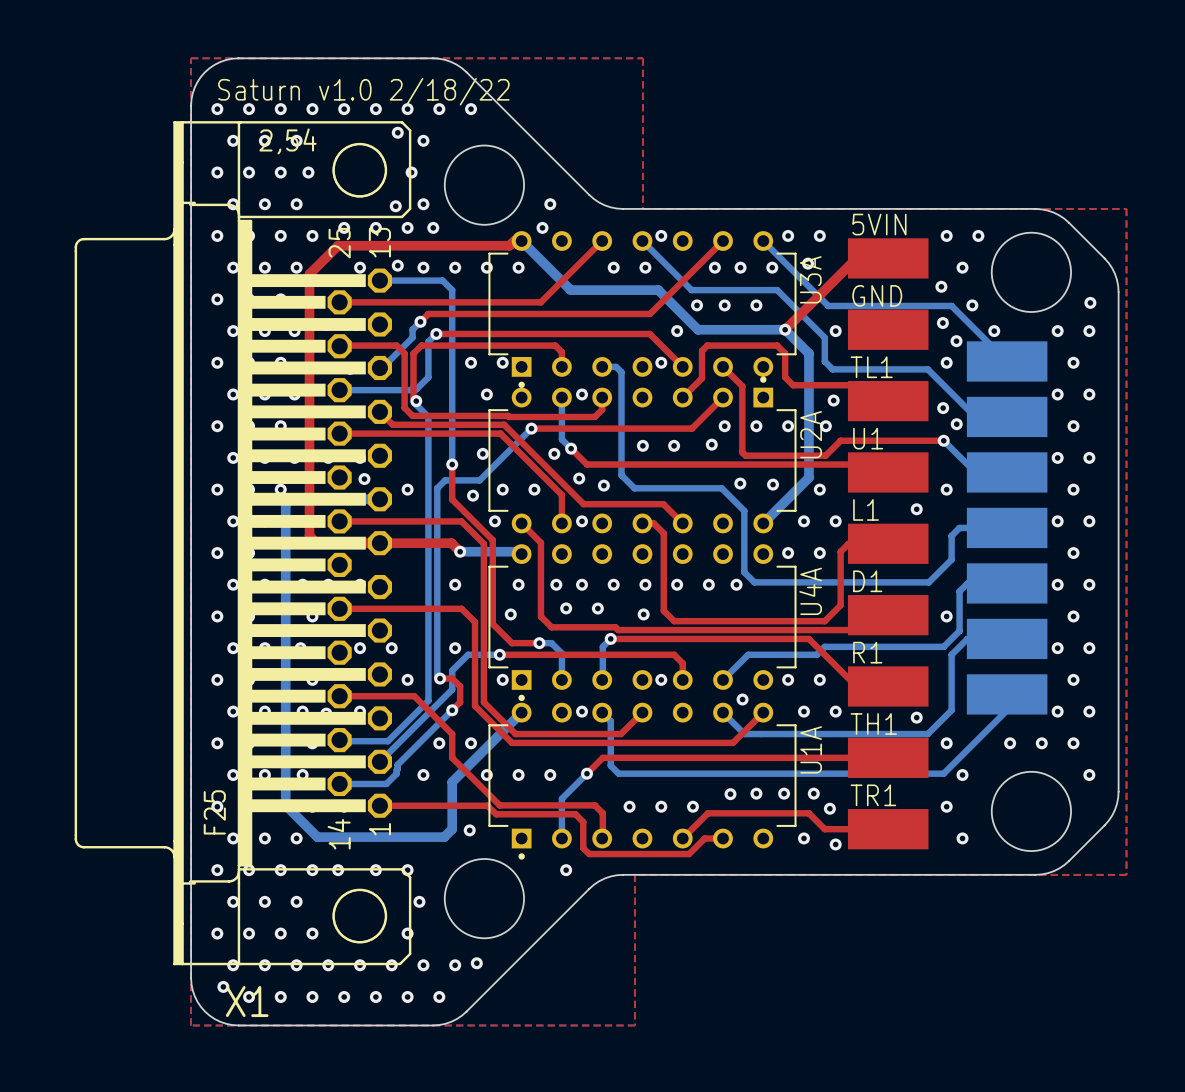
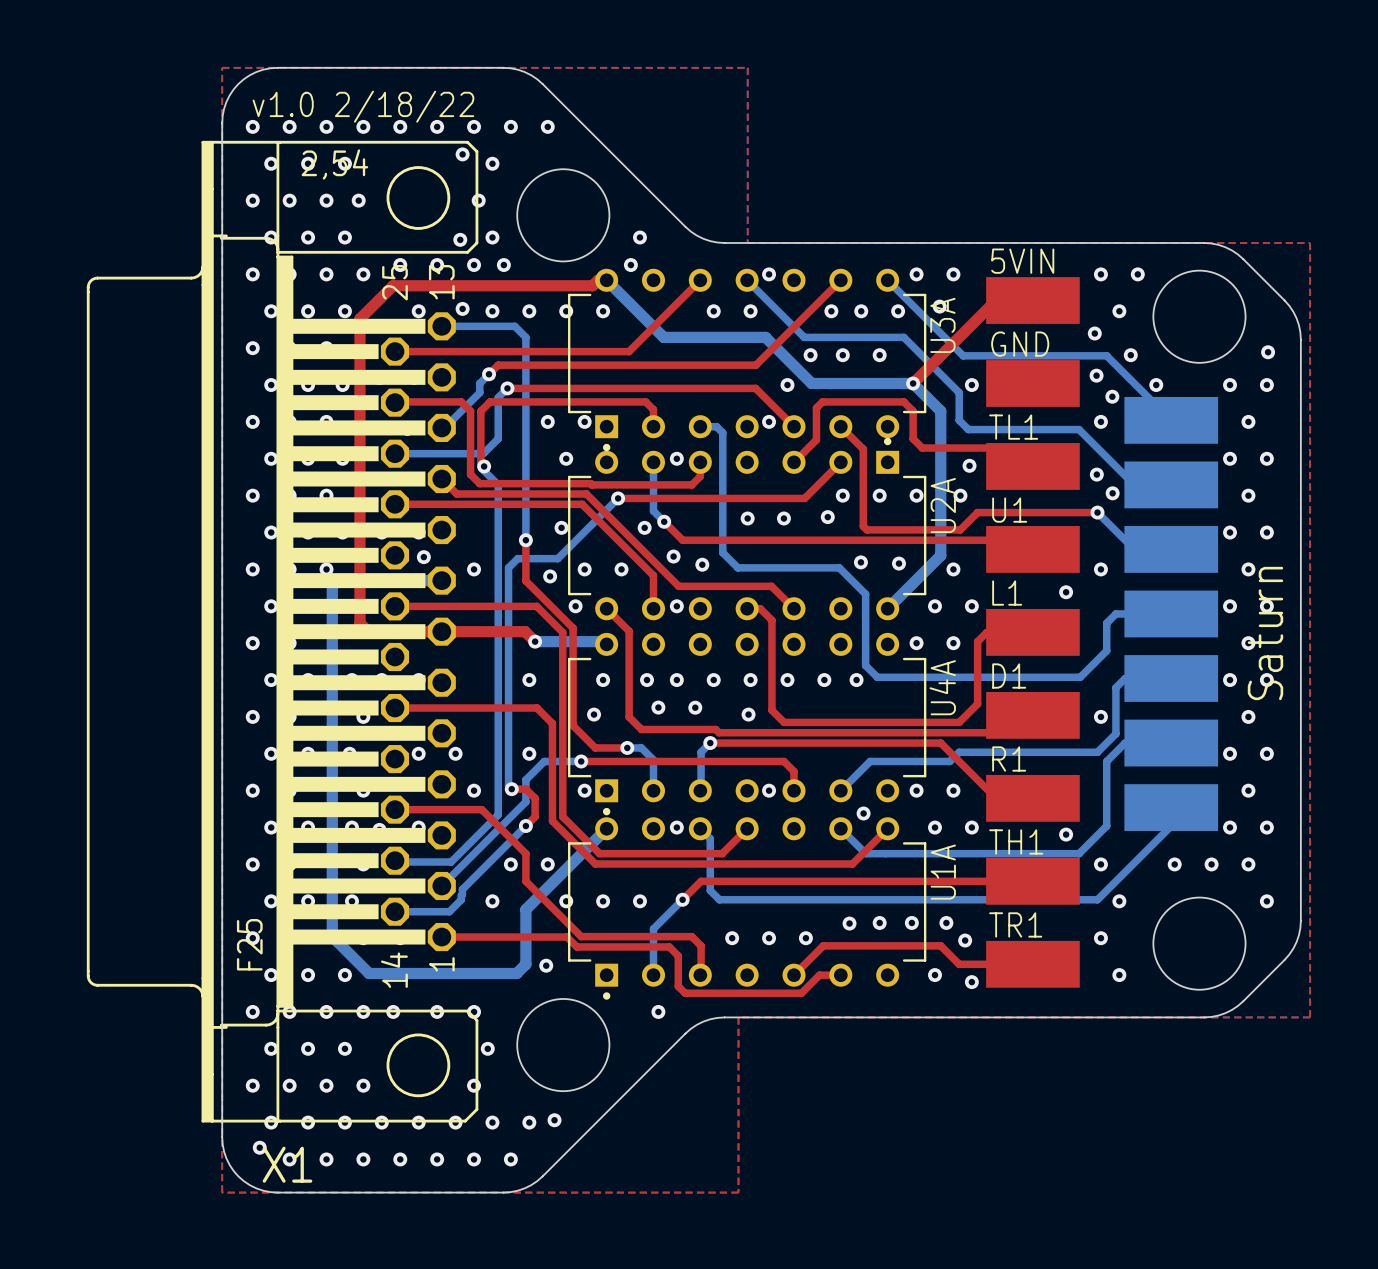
text: Saturn v1.0 2/18/22 (363, 91) -> v1.0 2/18/22 (363, 106)
text: none -> Saturn (1265, 633)

